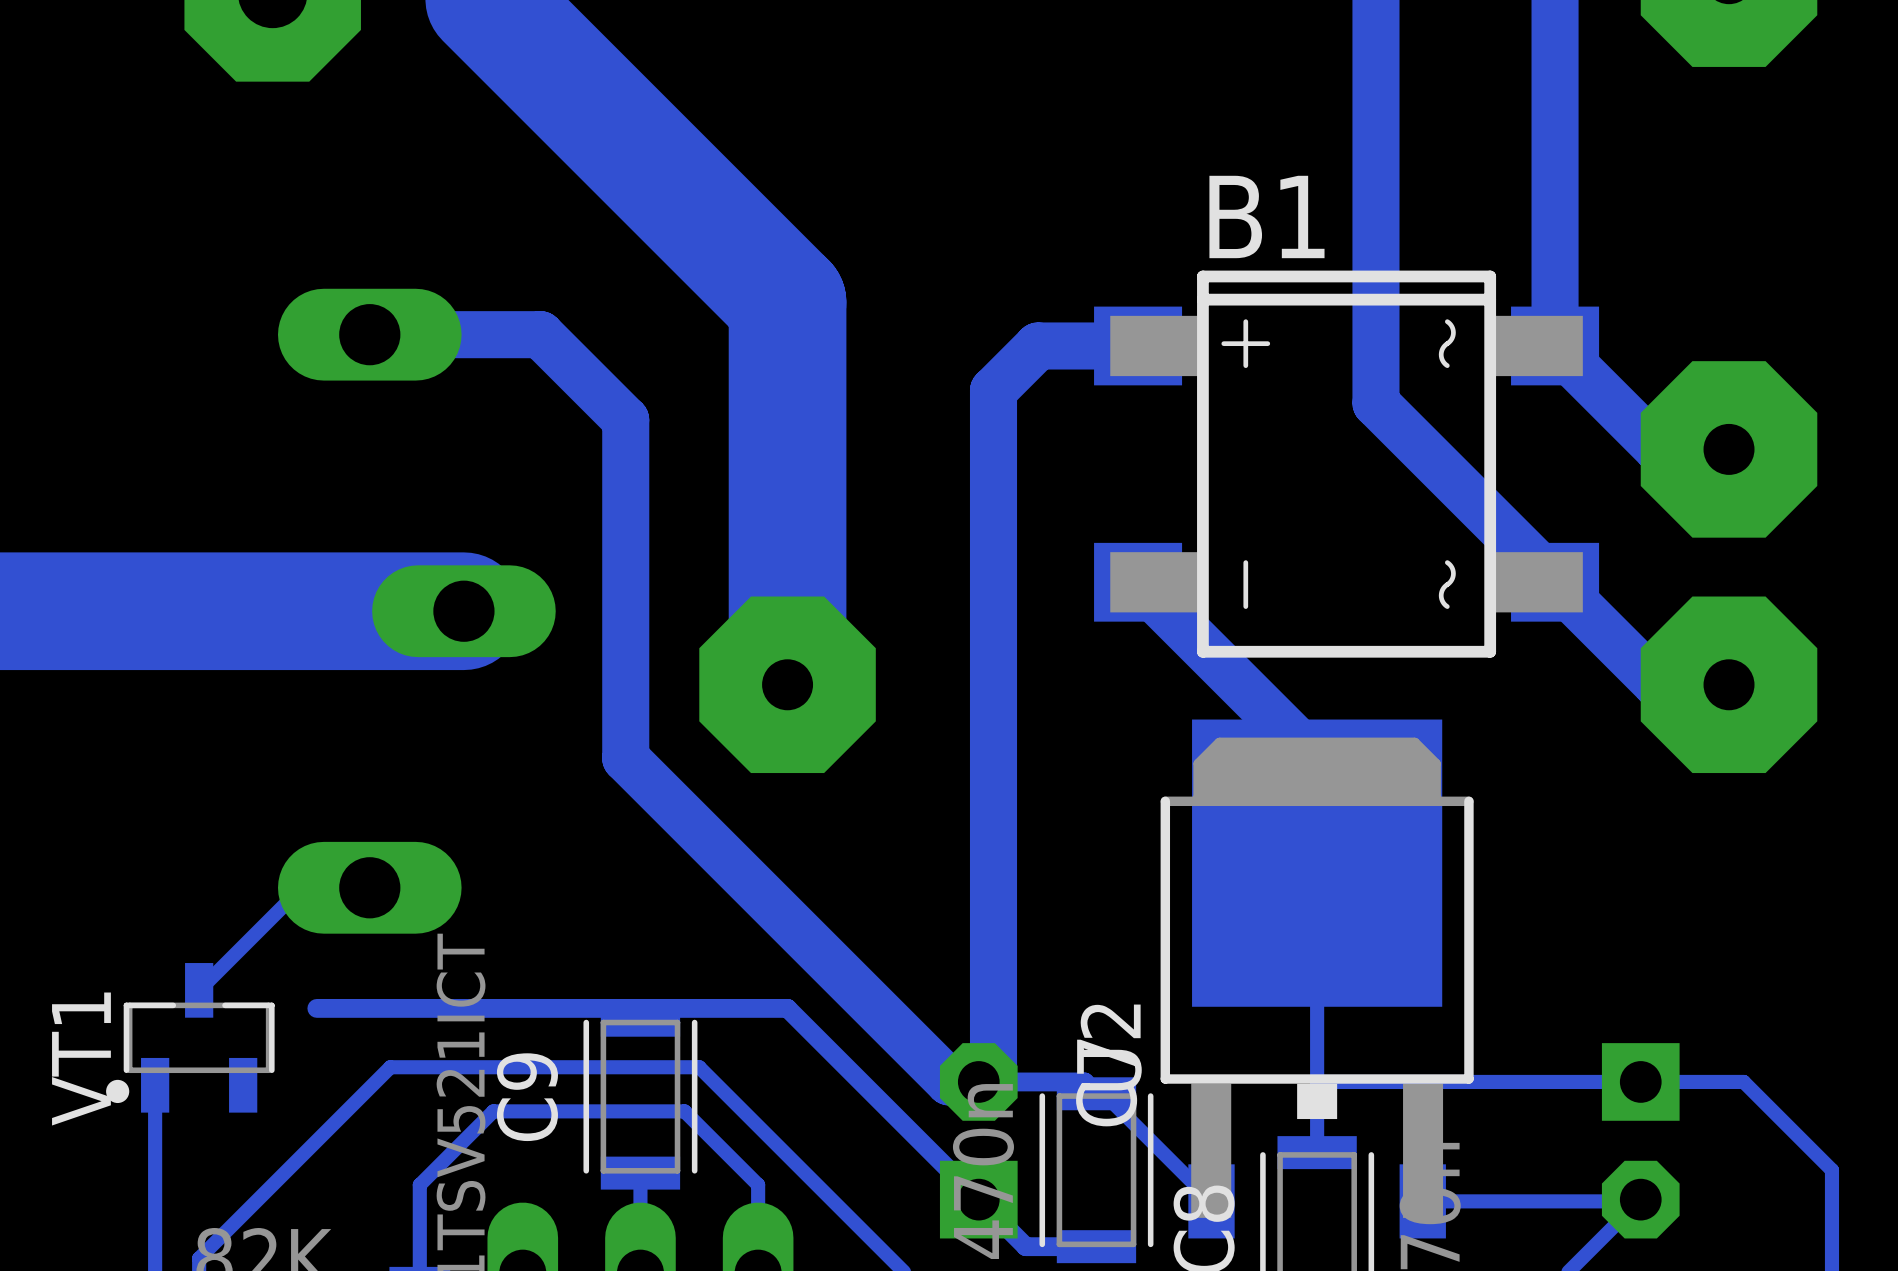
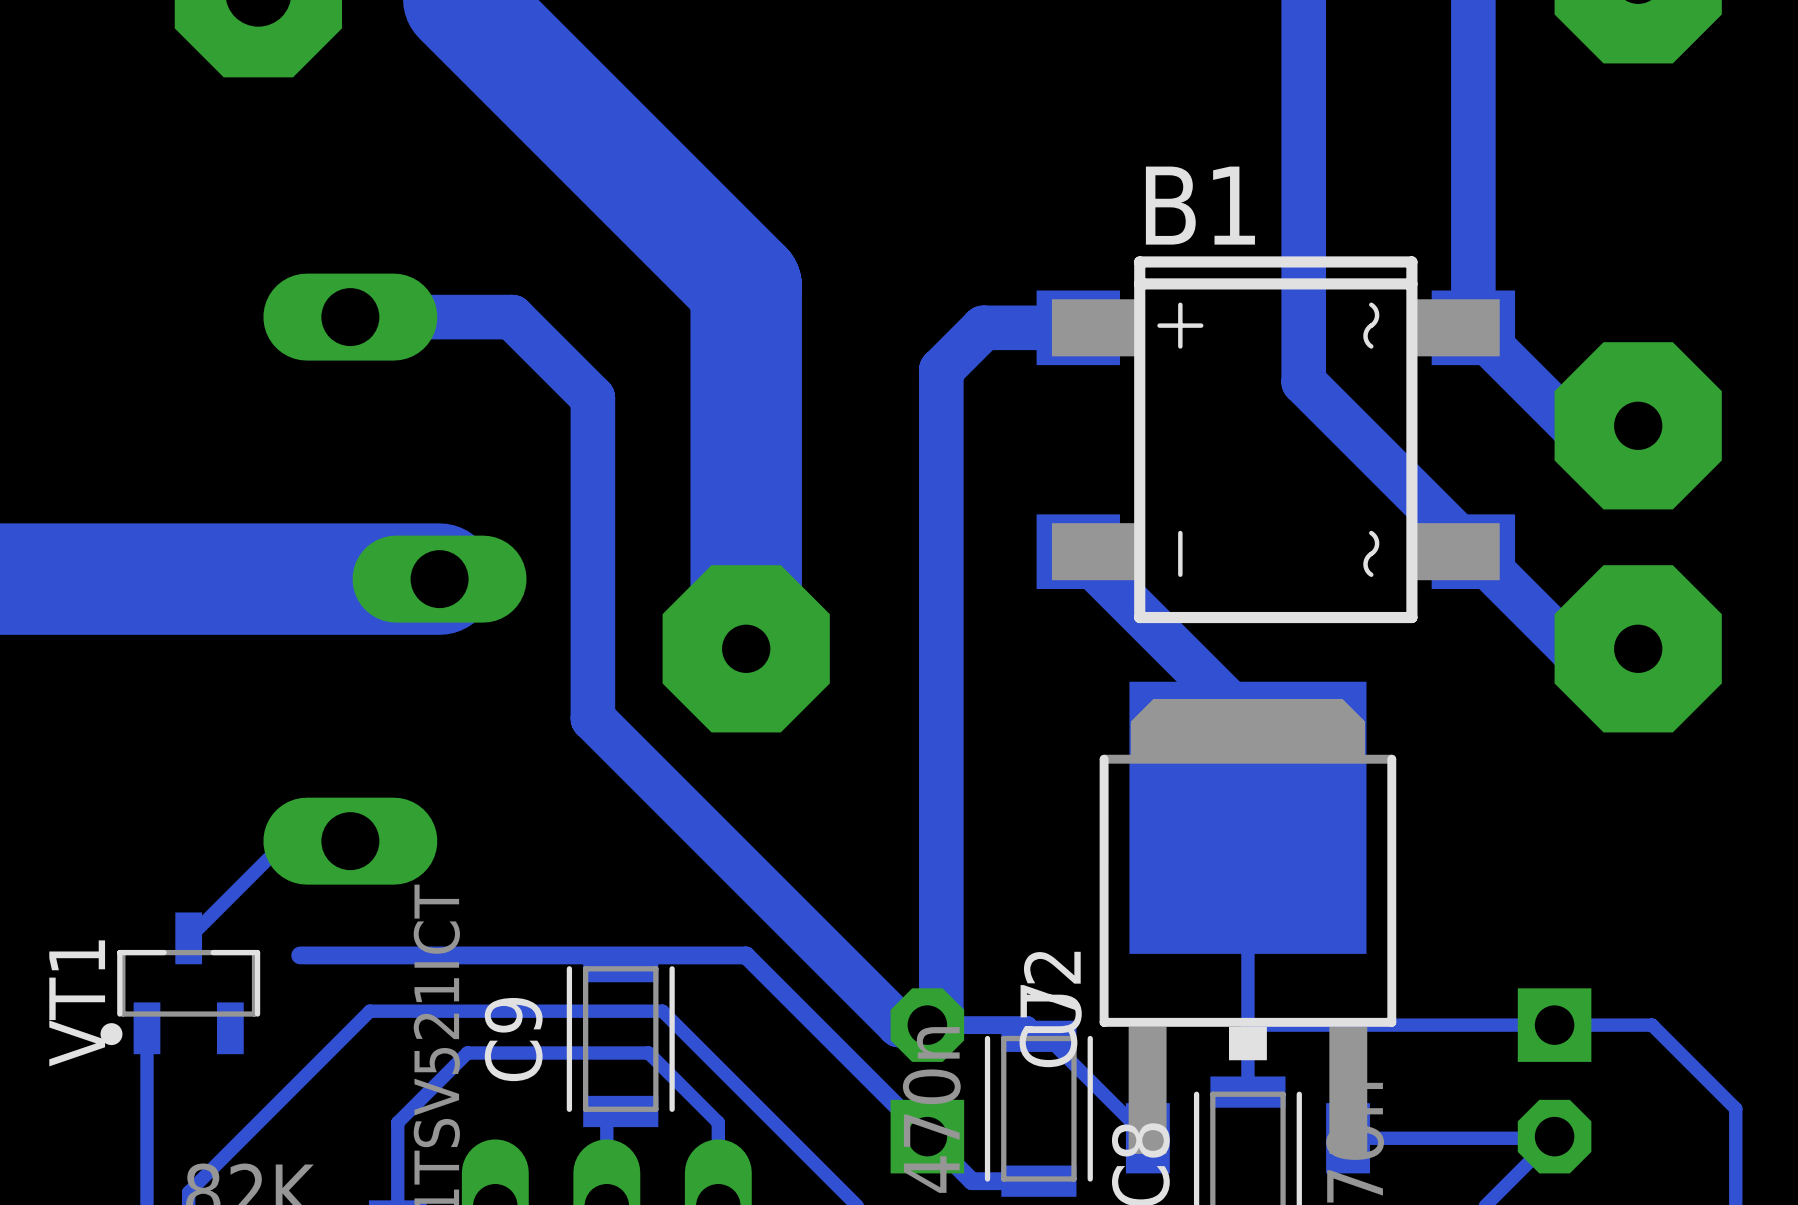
C9 position: (640, 1096) -> (620, 1039)

